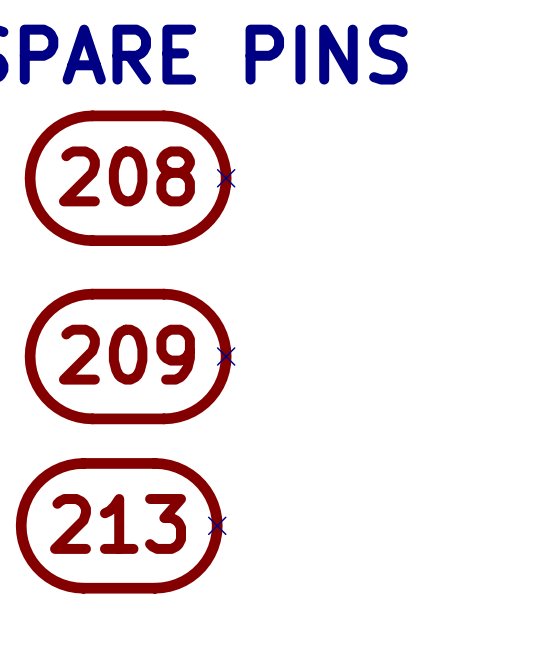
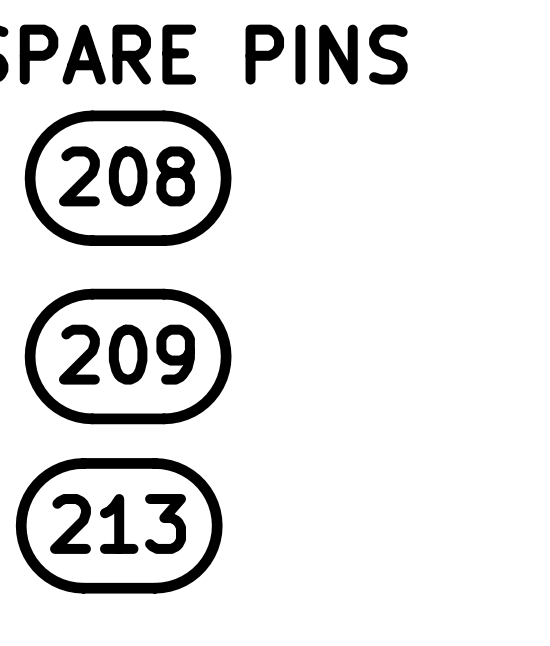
no-connect mark: (226, 178) -> none
no-connect mark: (226, 356) -> none
no-connect mark: (217, 525) -> none

